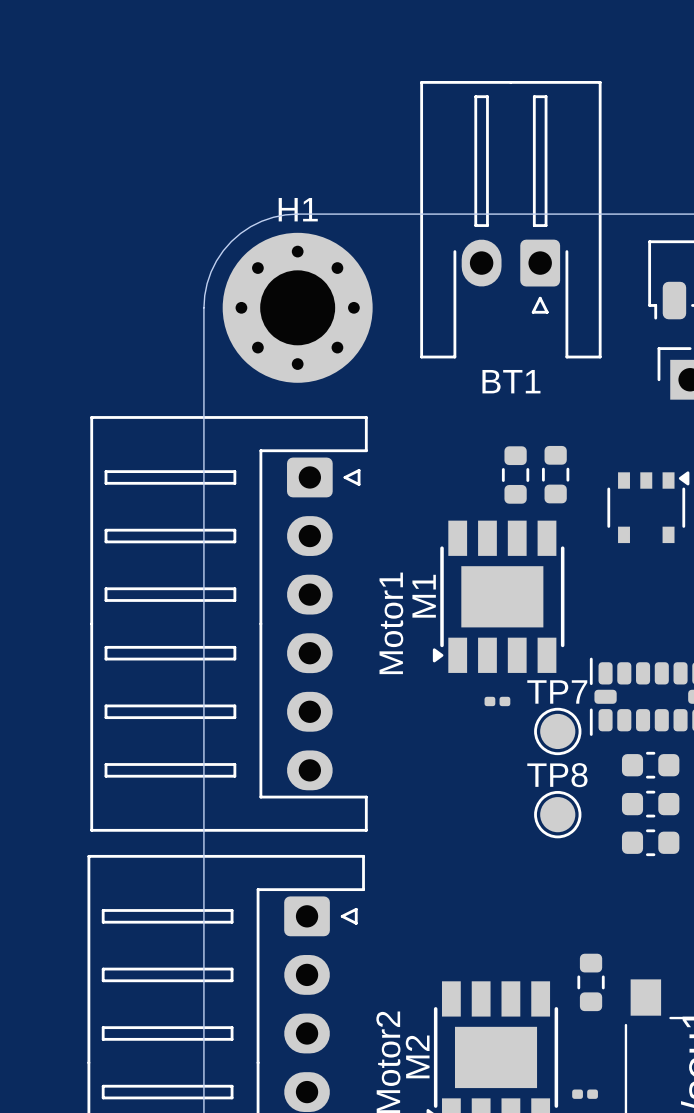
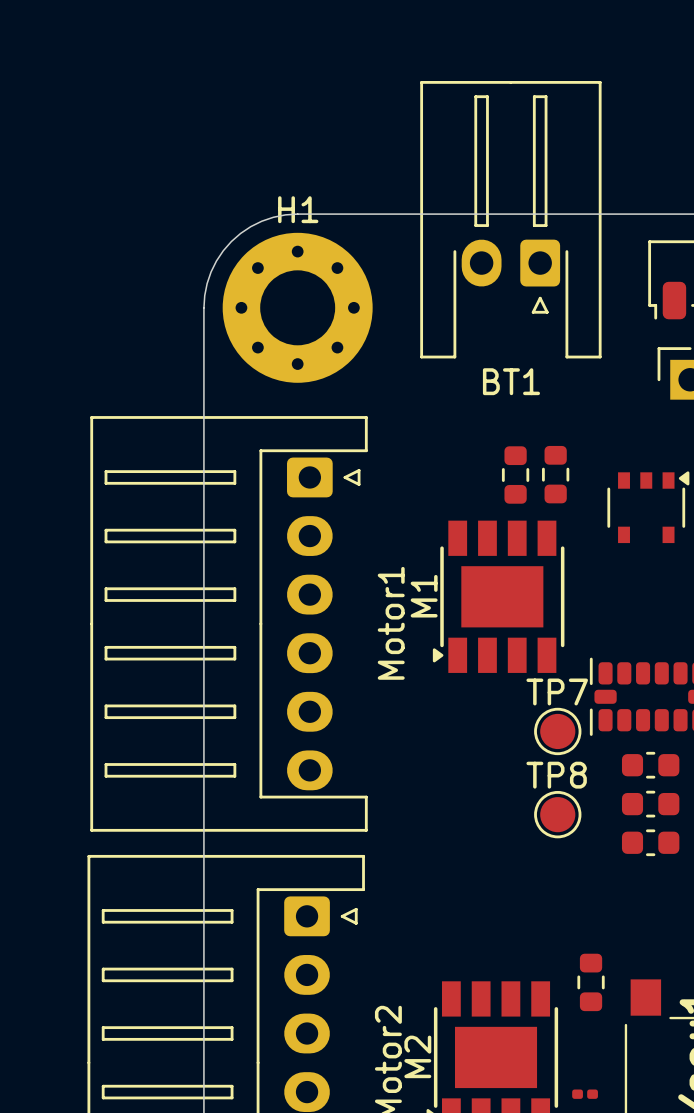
part: (497, 701) -> none

